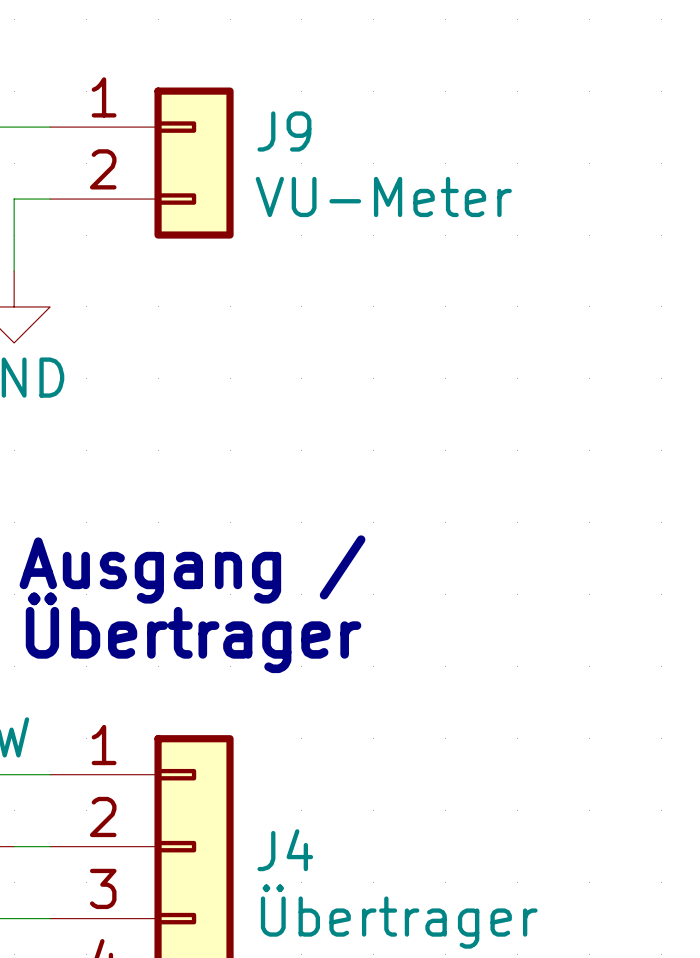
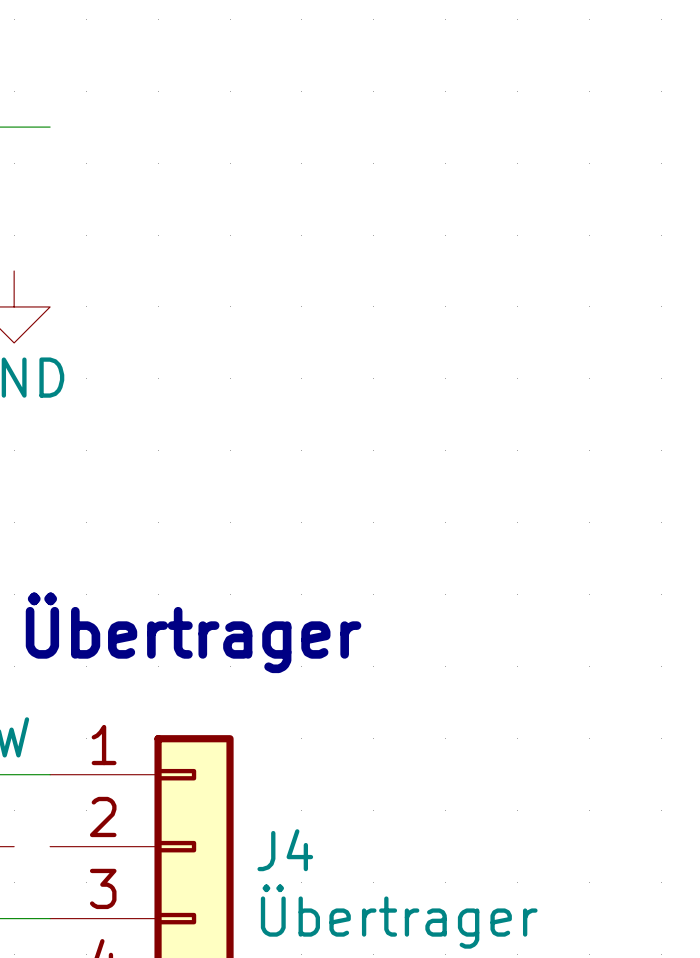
J9: VU-Meter (141, 163) -> none
wire: (50, 199) (14, 199) (14, 270) -> none
text: Ausgang / (192, 569) -> none
wire: (14, 846) (50, 846) -> none

